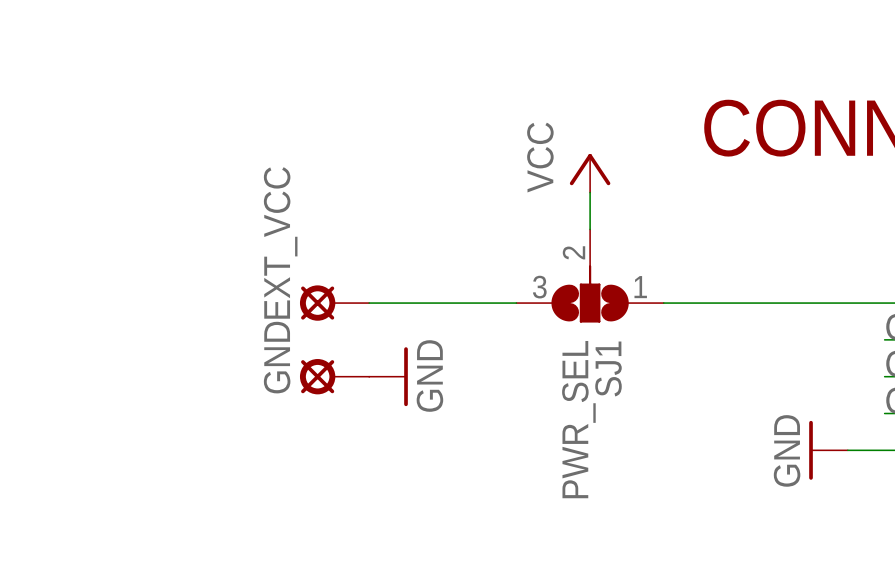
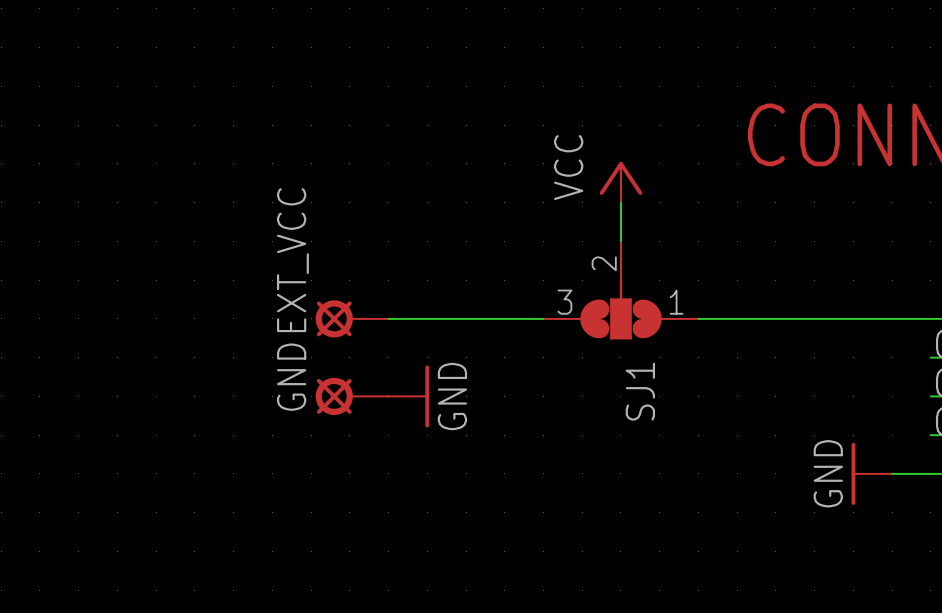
SJ1 value: PWR_SEL (578, 419) -> none

